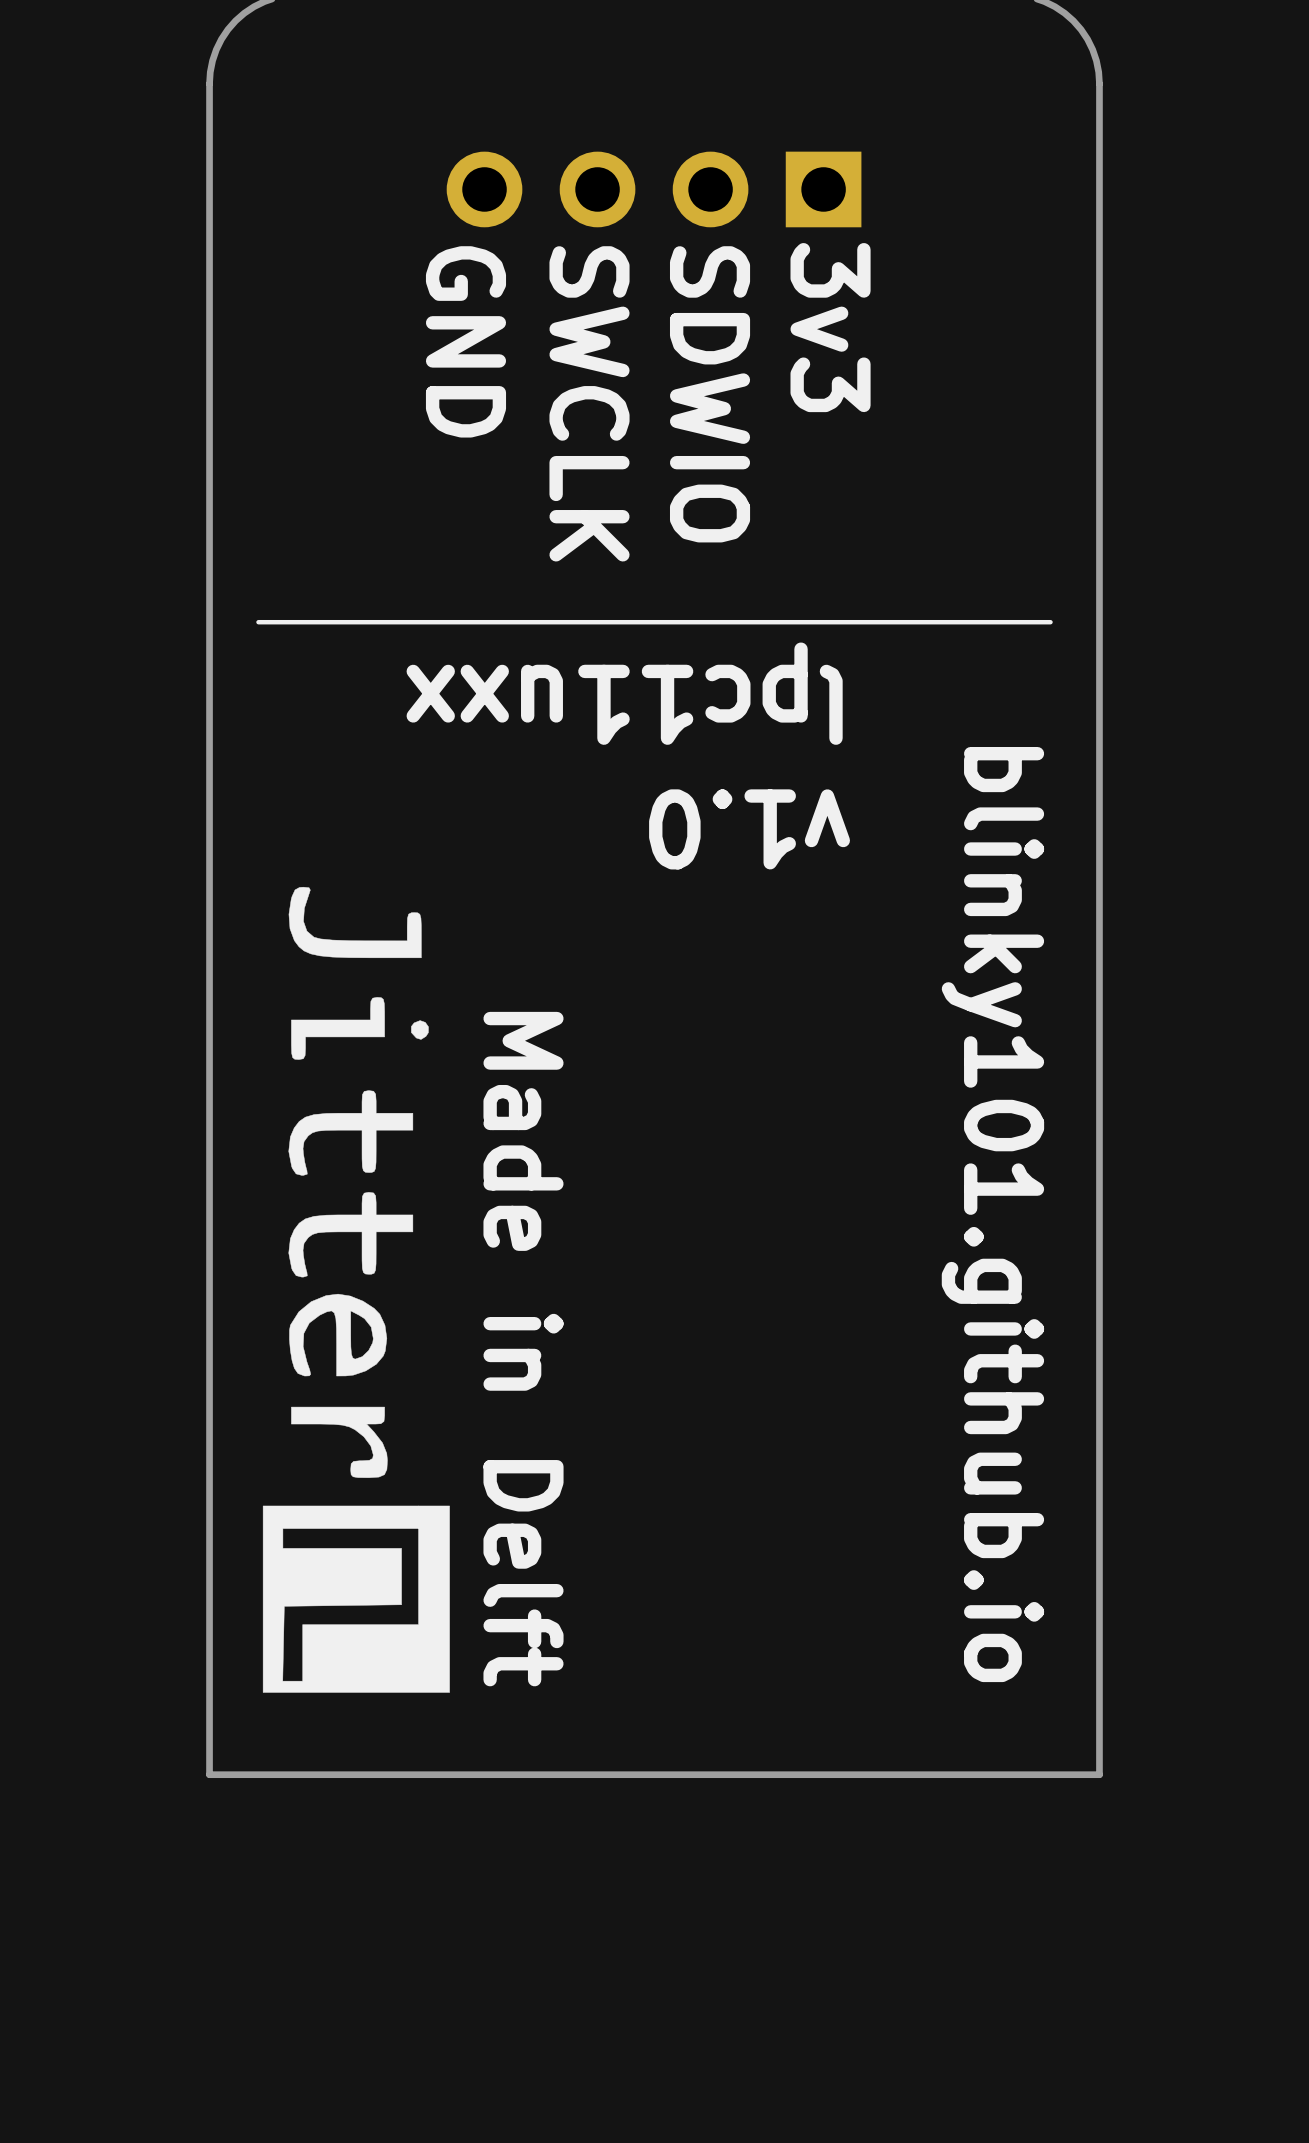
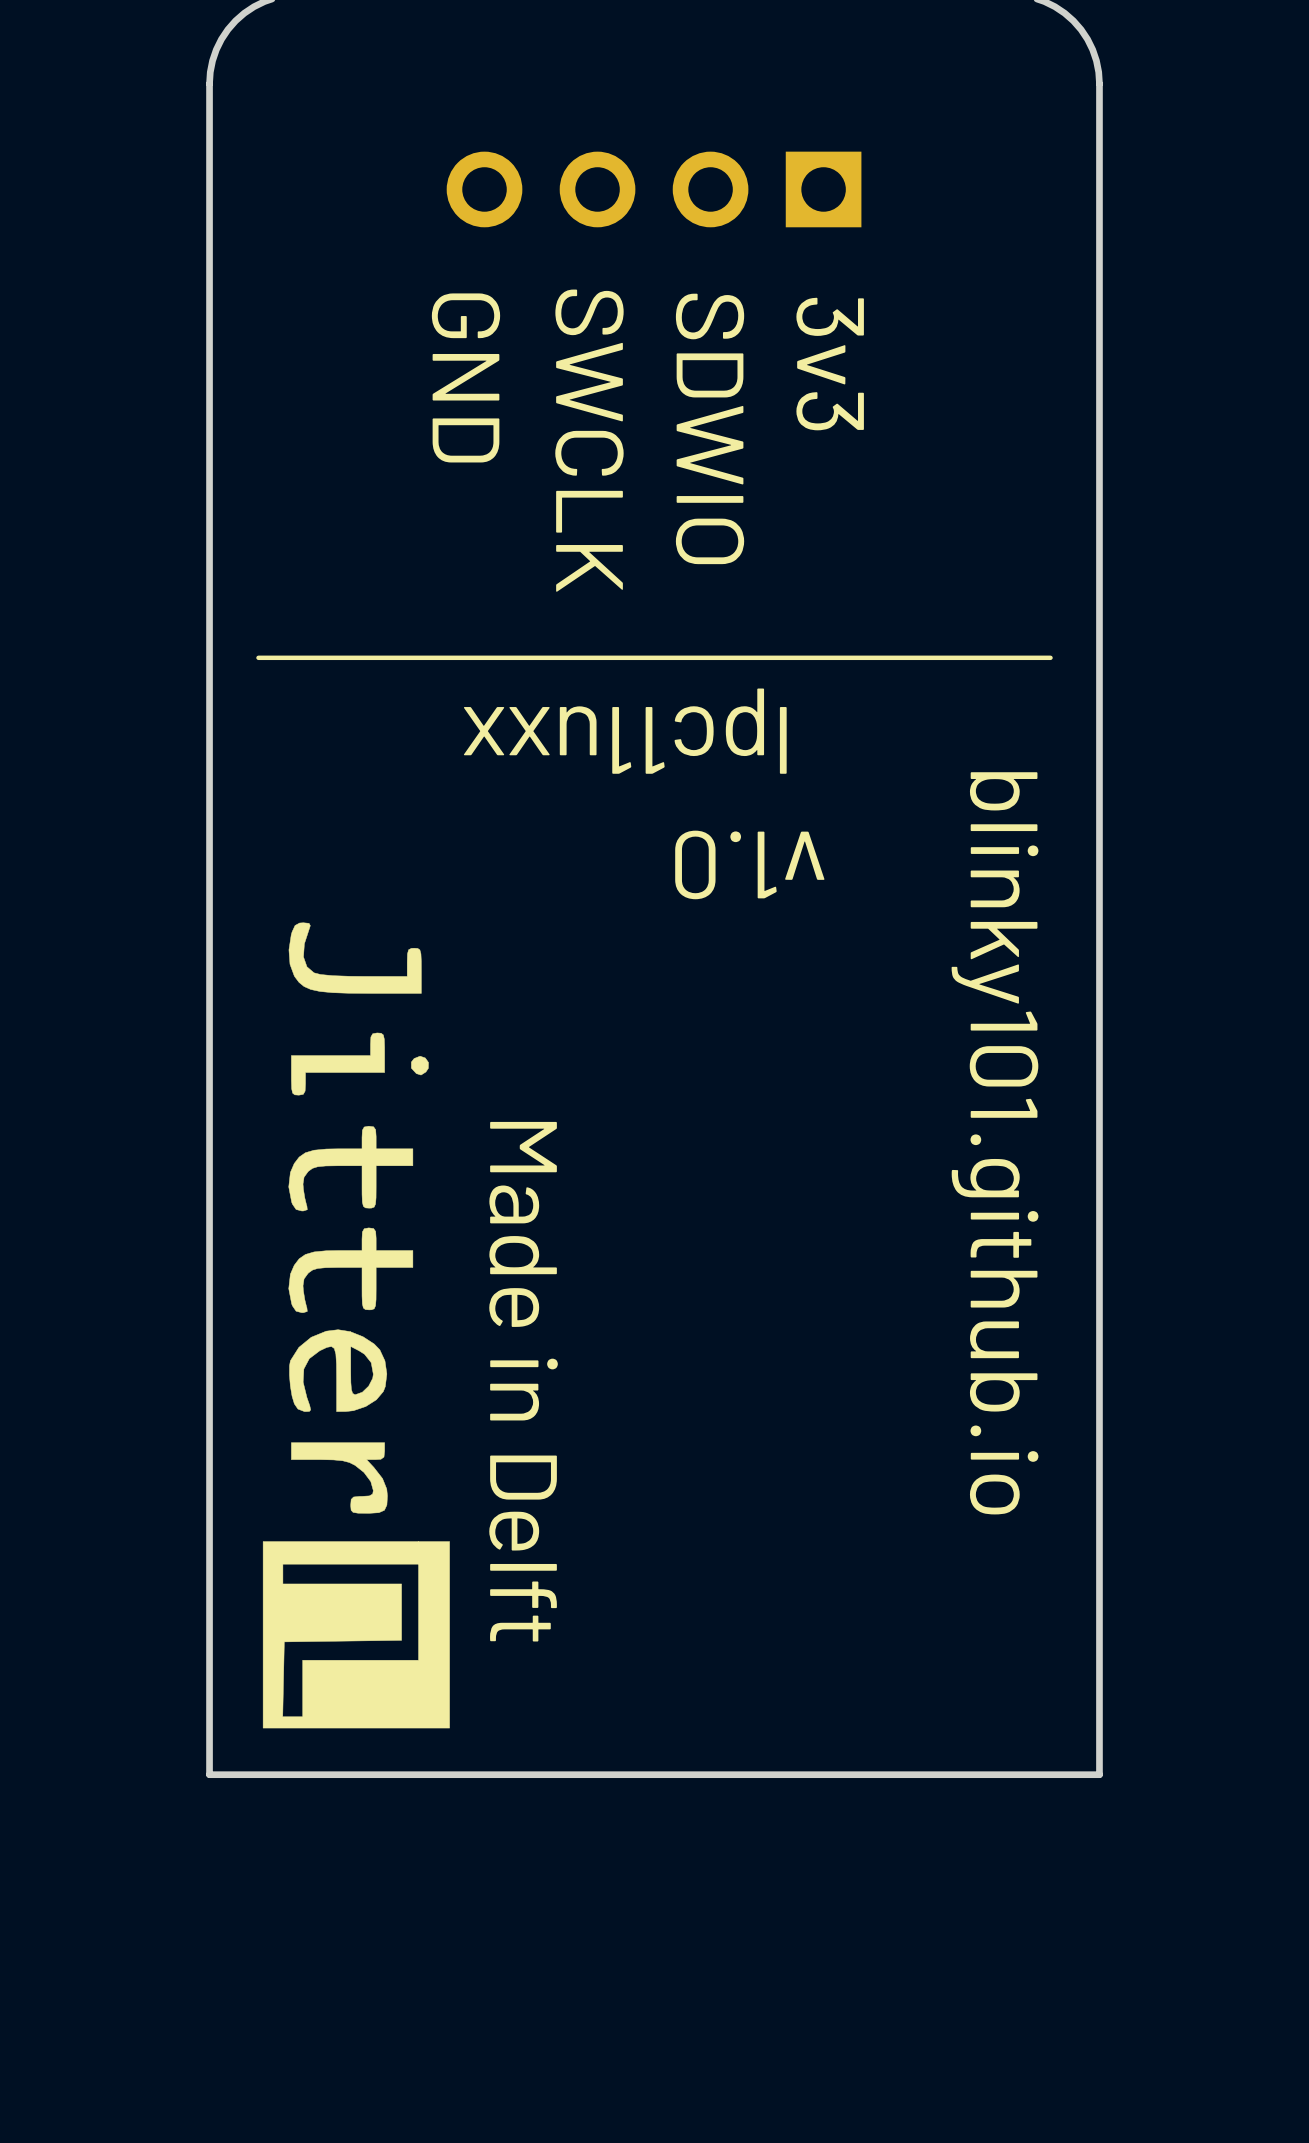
text position: 3v3 (830, 327) -> 3v3 (830, 364)
text position: GND (465, 341) -> GND (465, 377)
text position: SDWIO (710, 394) -> SDWIO (710, 428)
text position: SWCLK (589, 403) -> SWCLK (589, 440)
line: (1050, 622) (258, 622) -> (1050, 657) (258, 657)
text position: lpc11uxx (624, 693) -> lpc11uxx (625, 731)
text position: v1.0 (749, 829) -> v1.0 (749, 864)
text position: blinky101.github.io (992, 1214) -> blinky101.github.io (995, 1143)
drawing position: (356, 1289) -> (356, 1325)
text position: Made in Delft (523, 1349) -> Made in Delft (523, 1381)

